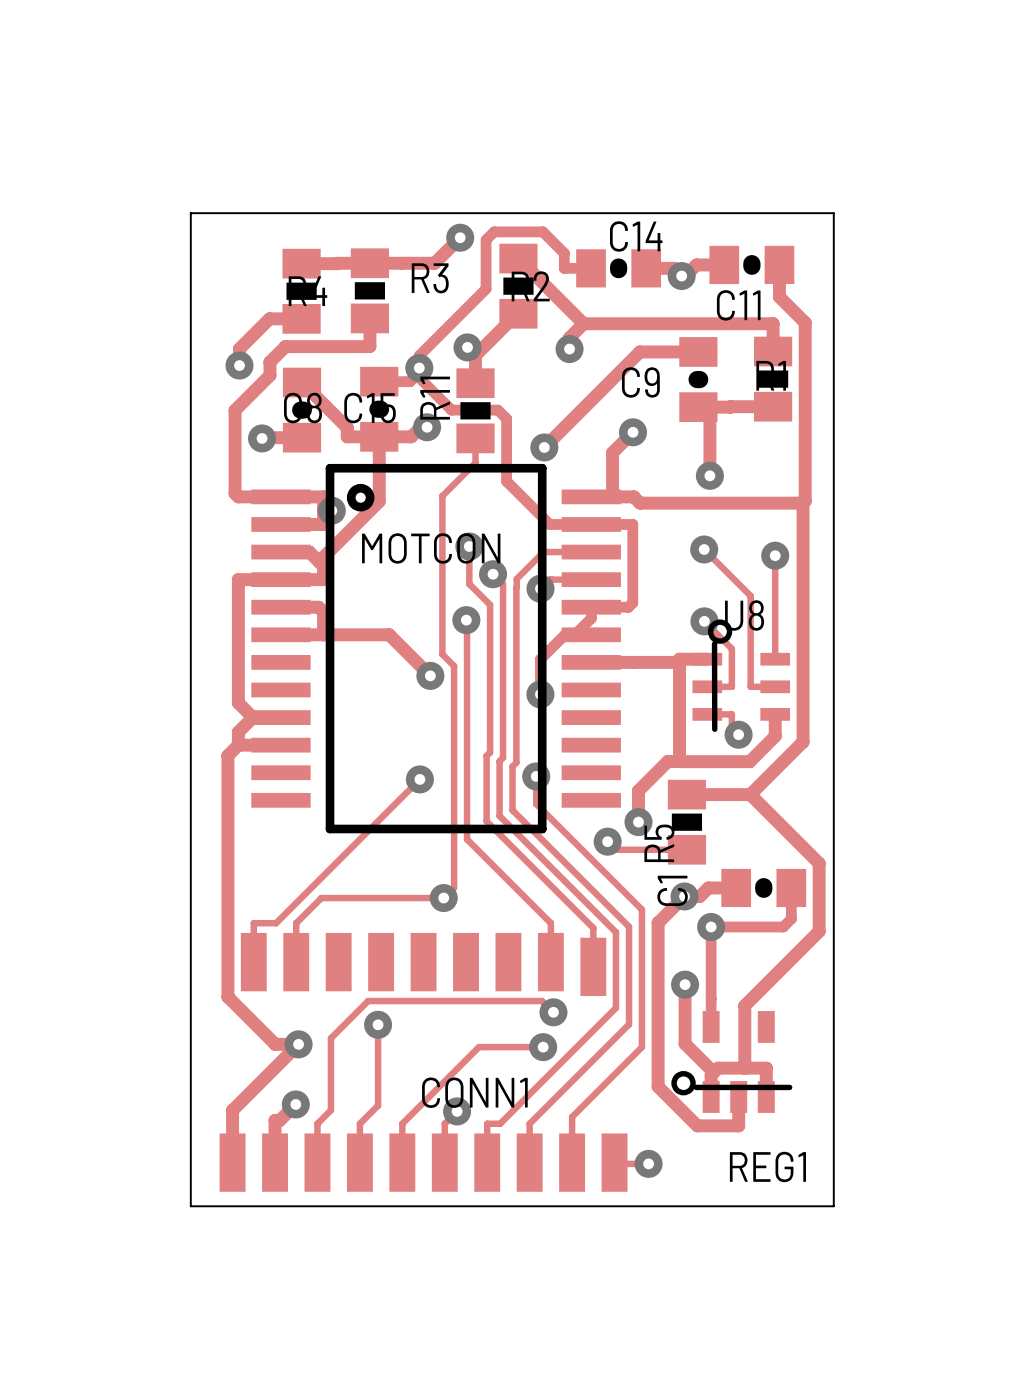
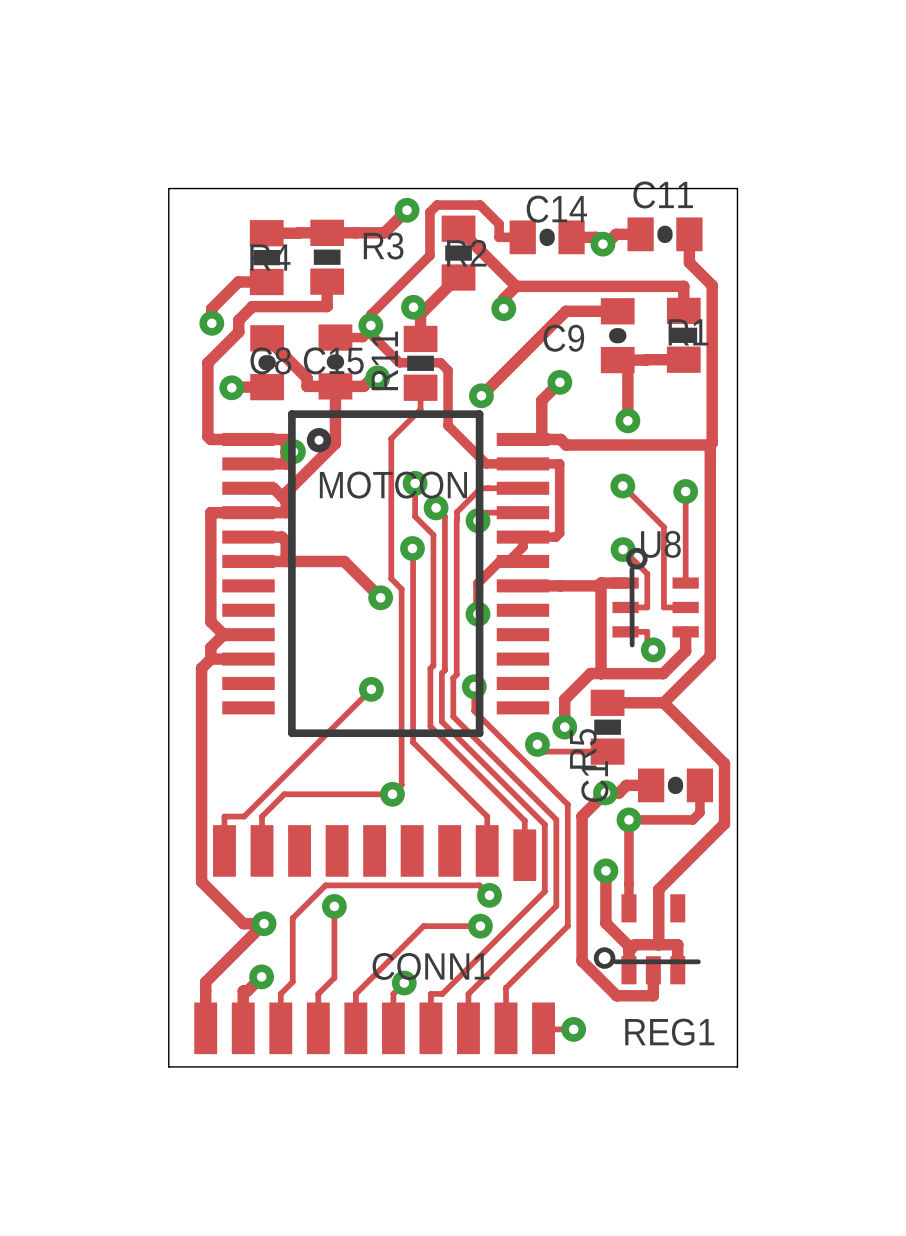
C11 name position: C11 (738, 305) -> C11 (663, 194)

